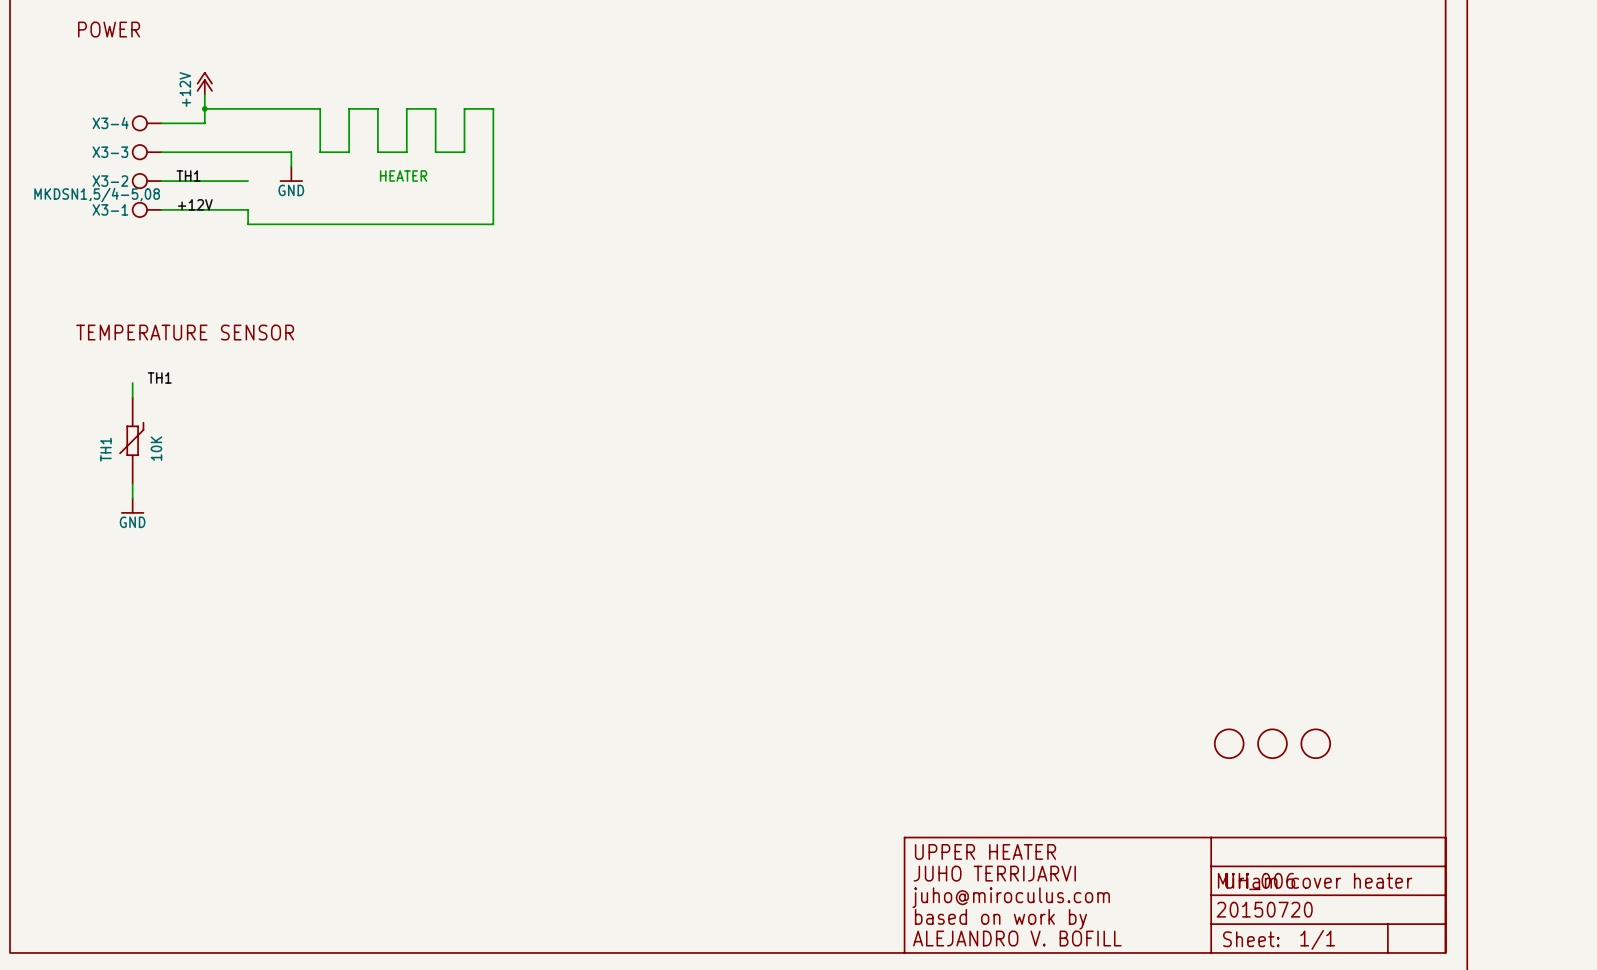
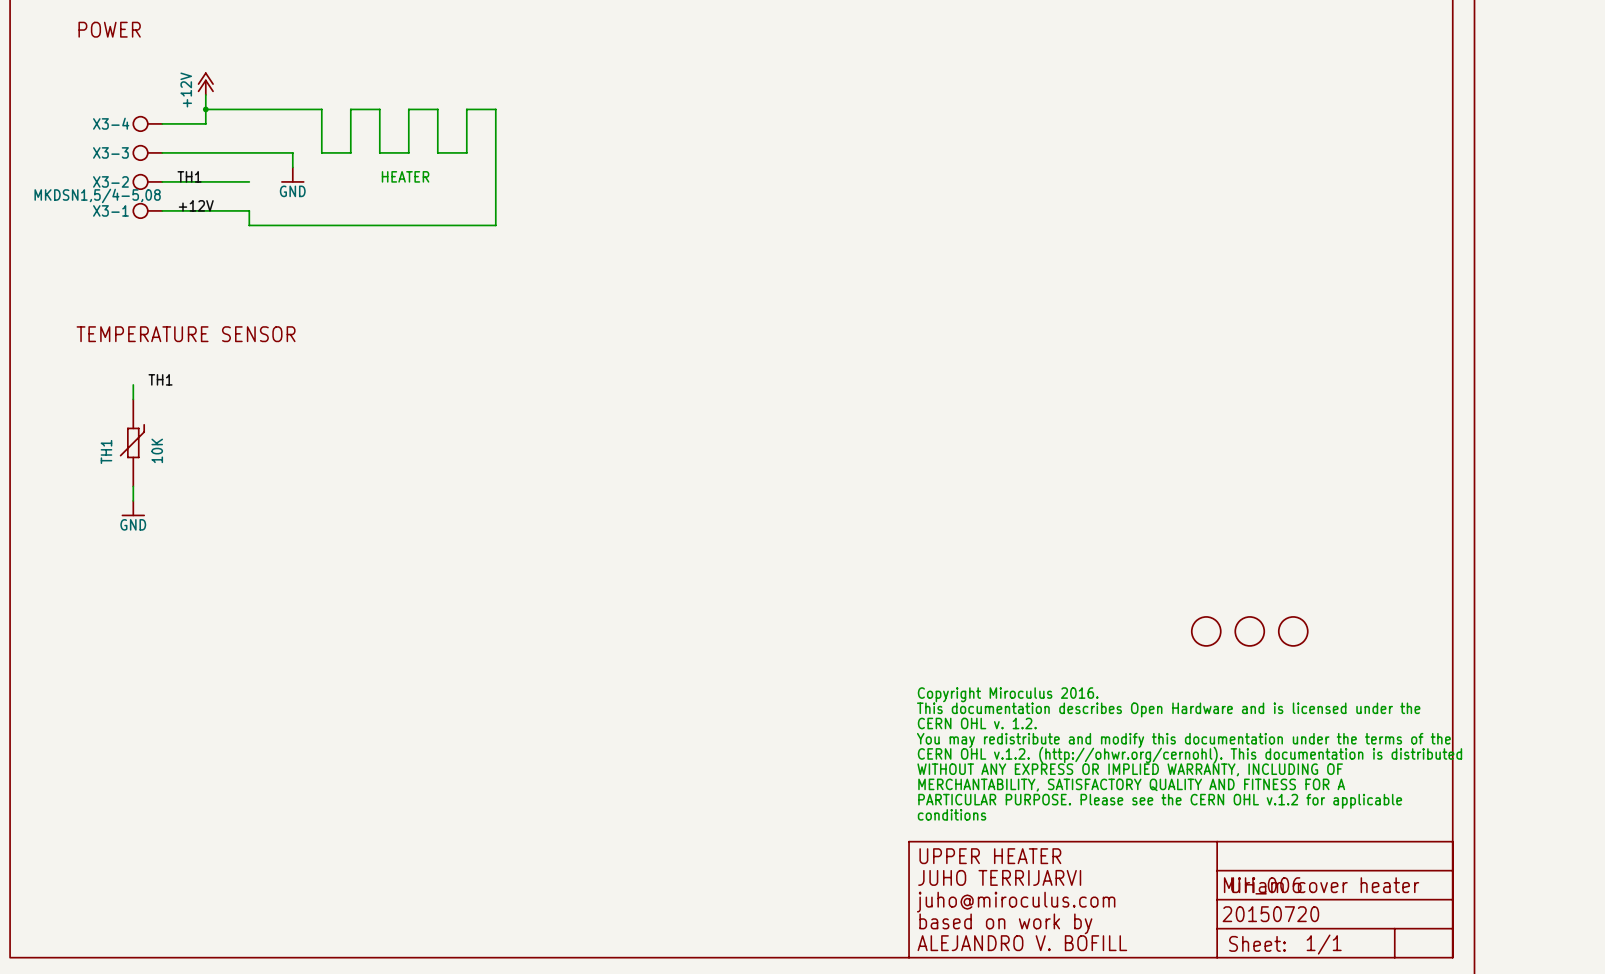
part: none -> (1206, 631)
part: none -> (1249, 631)
part: none -> (1293, 631)
text: none -> Copyright Miroculus 2016. (1008, 694)
text: none -> This documentation describes Open Hardware and is licensed under the (1168, 709)
text: none -> CERN OHL v. 1.2. (977, 723)
text: none -> You may redistribute and modify this documentation under the terms of the (1183, 740)
part: (1229, 743) -> none
part: (1272, 743) -> none
part: (1315, 743) -> none
text: none -> CERN OHL v.1.2. (http://ohwr.org/cernohl). This documentation is distributed (1189, 755)
text: none -> WITHOUT ANY EXPRESS OR IMPLIED WARRANTY, INCLUDING OF (1130, 769)
text: none -> MERCHANTABILITY, SATISFACTORY QUALITY AND FITNESS FOR A (1131, 785)
text: none -> PARTICULAR PURPOSE. Please see the CERN OHL v.1.2 for applicable (1160, 801)
text: none -> conditions (952, 814)

